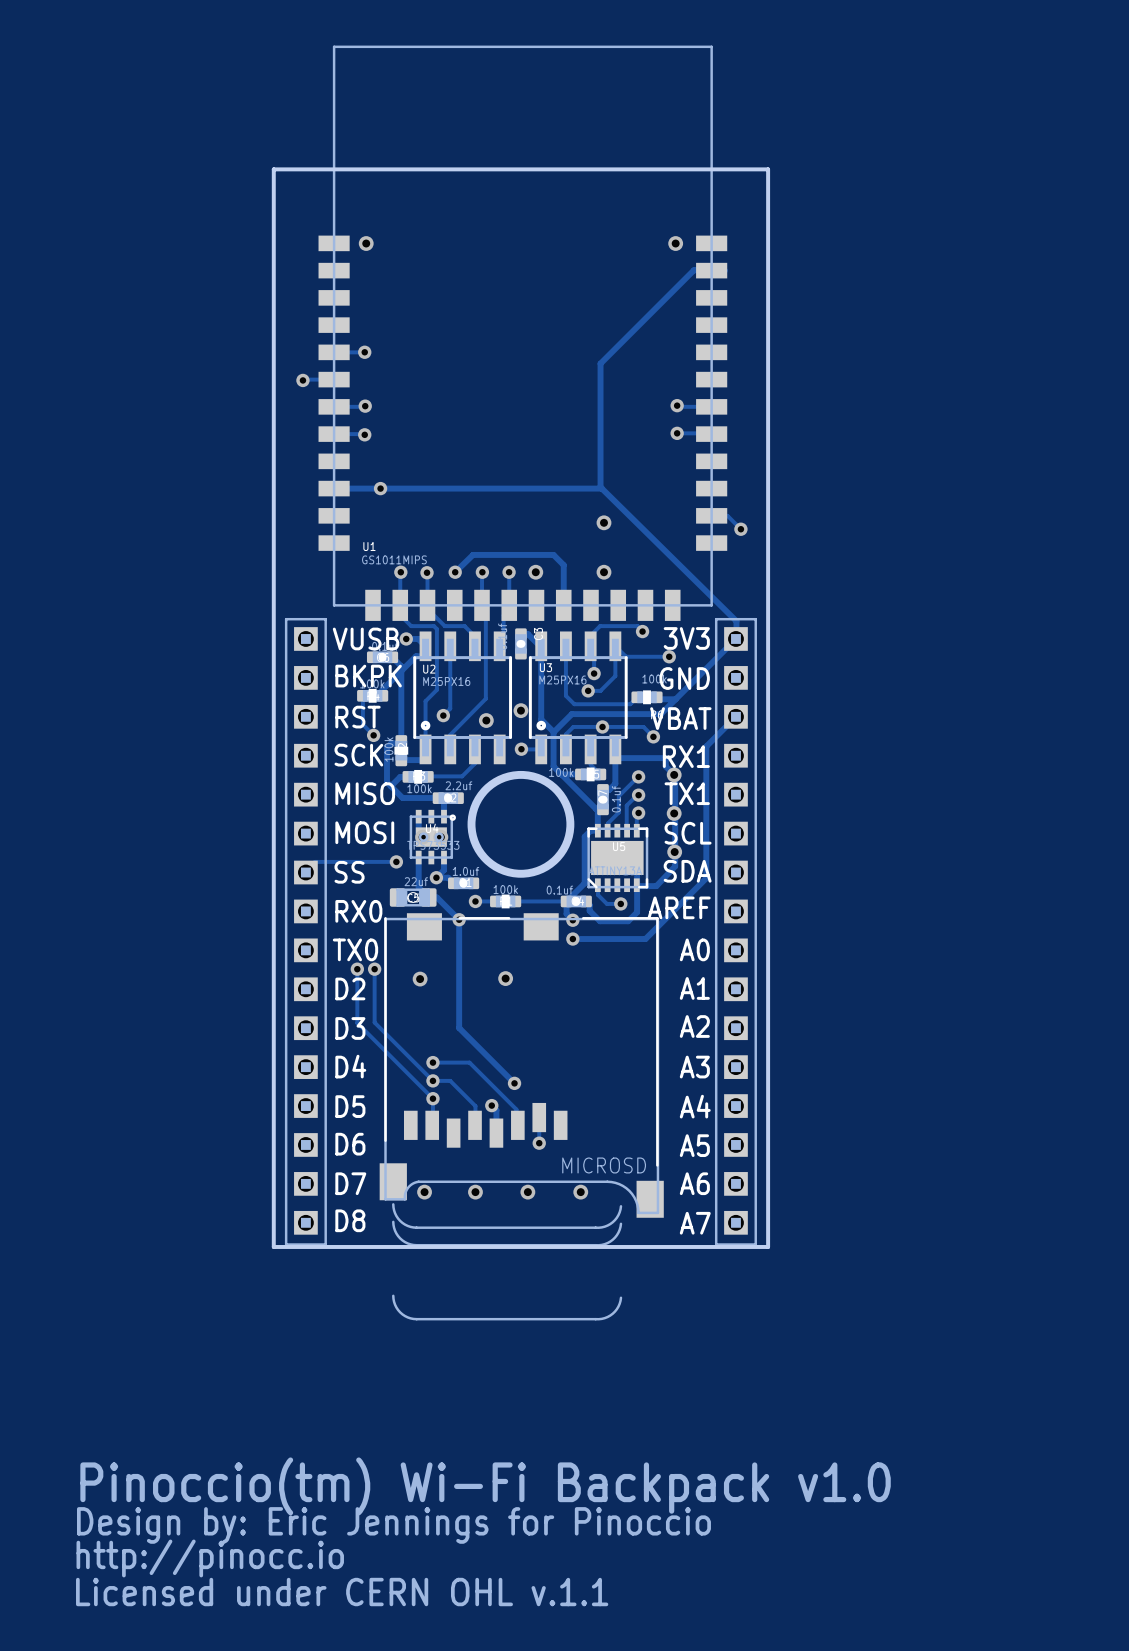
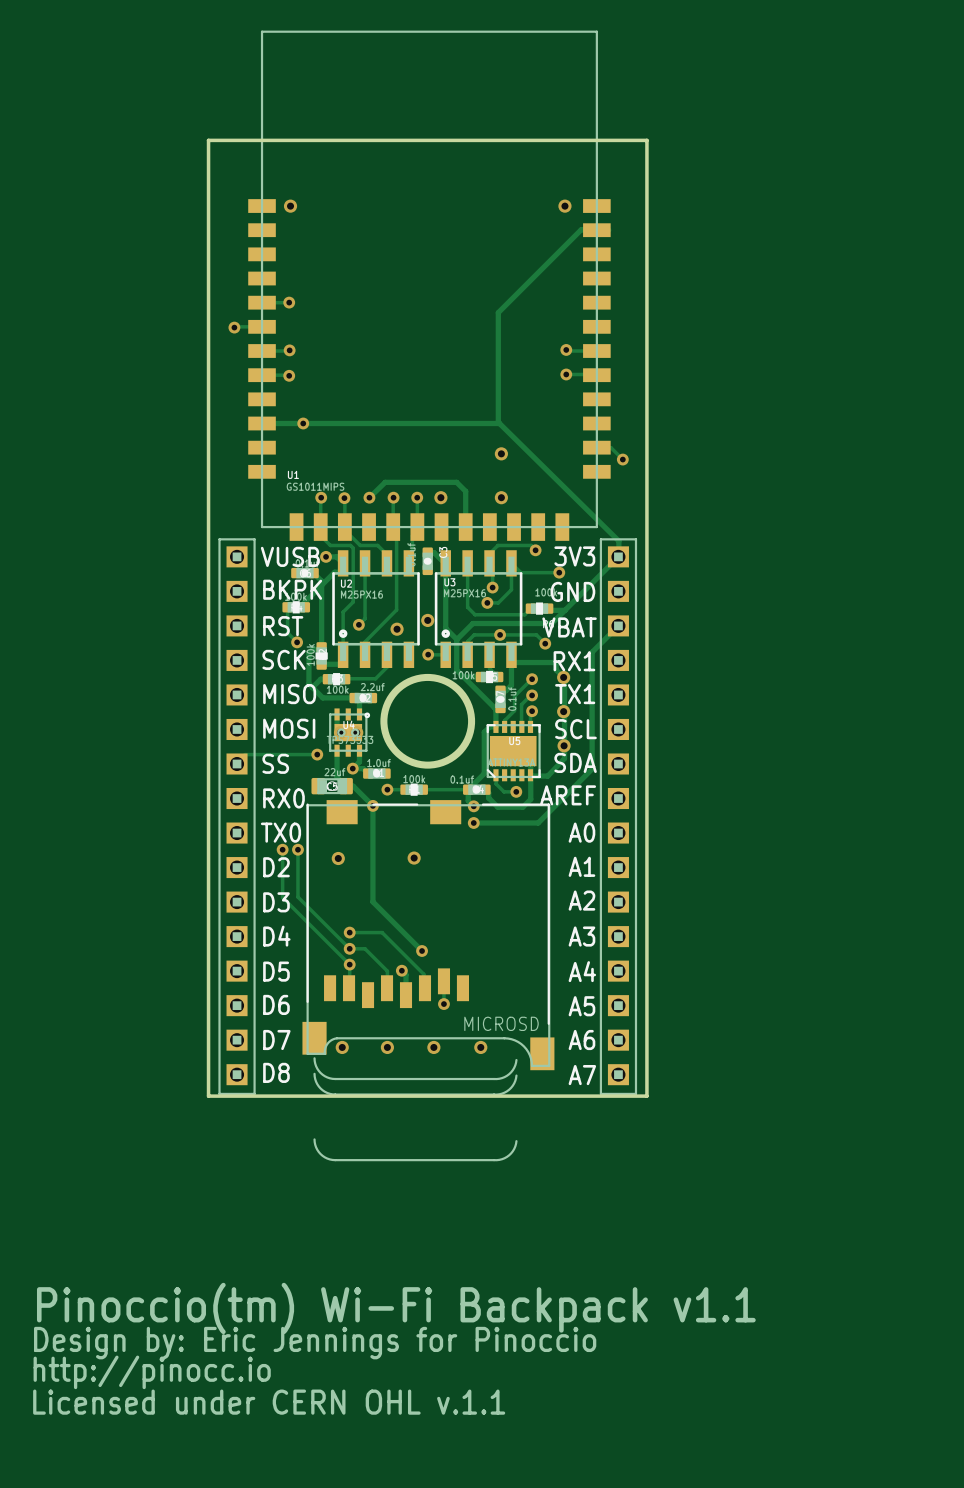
text: Pinoccio(tm) Wi-Fi Backpack v1.0 (485, 1486) -> Pinoccio(tm) Wi-Fi Backpack v1.1 (396, 1308)

